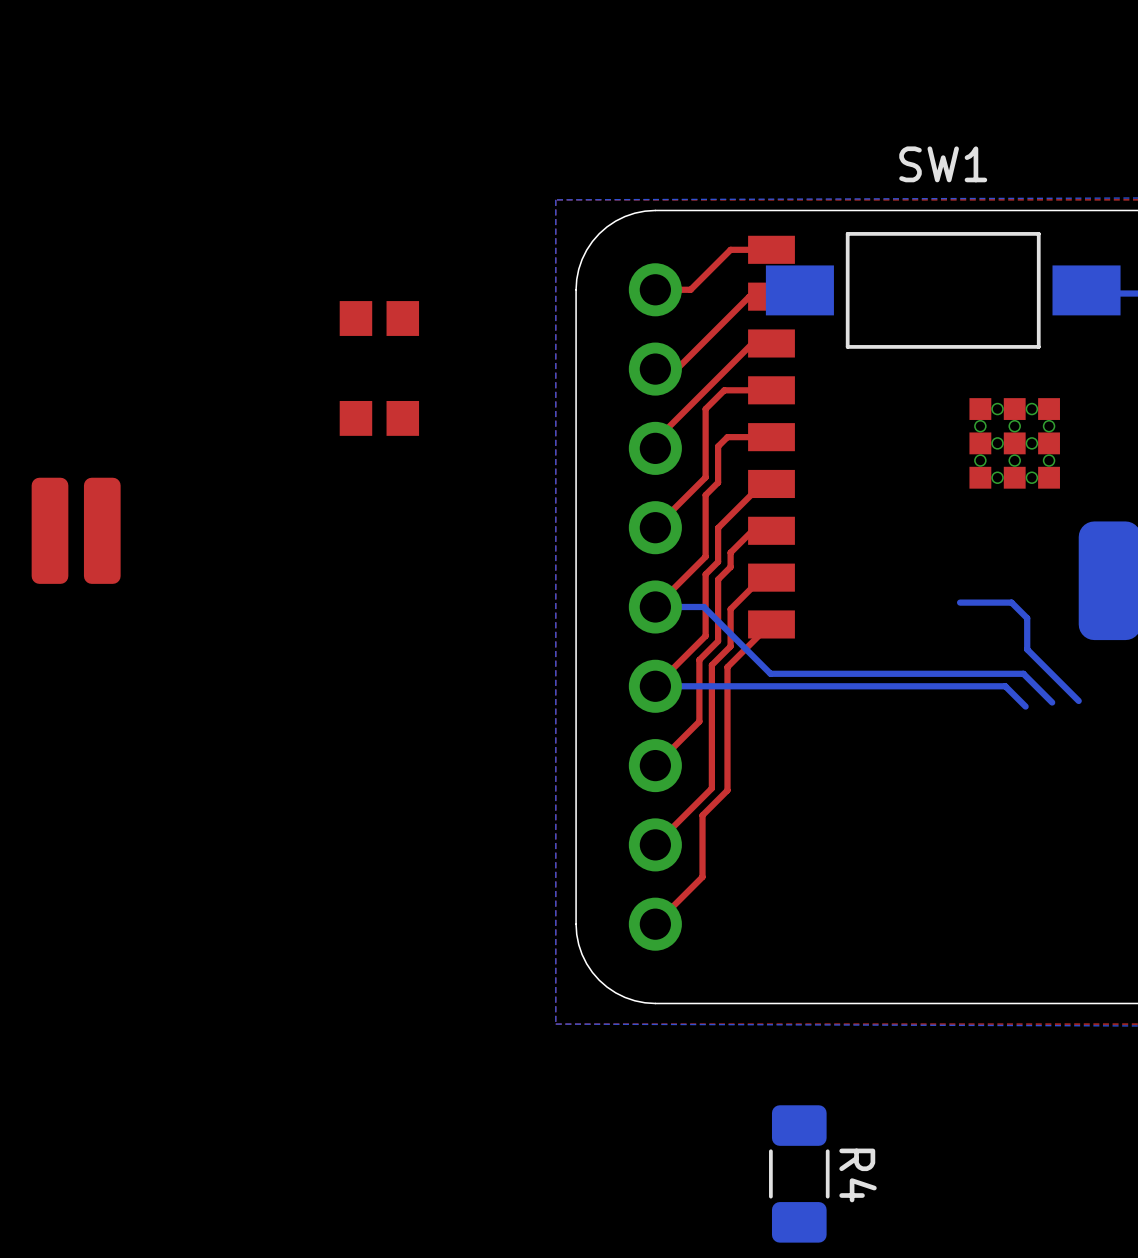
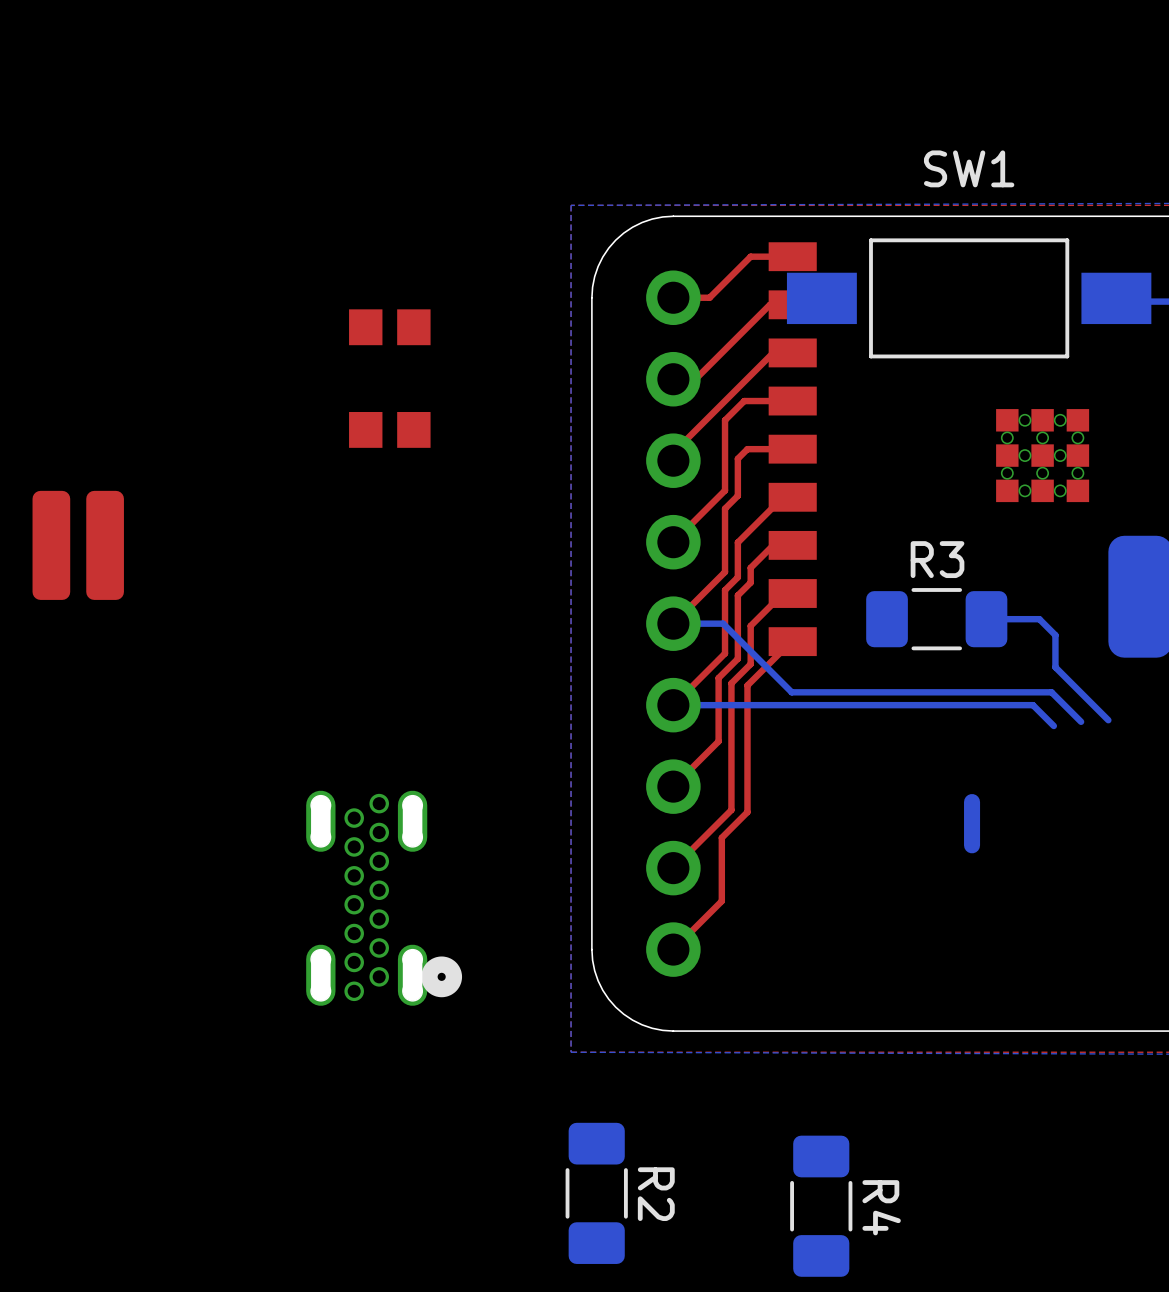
R3: none -> (936, 619)
bottom track: none -> (972, 802) (972, 845)
part: none -> (384, 898)
R2: none -> (596, 1193)

